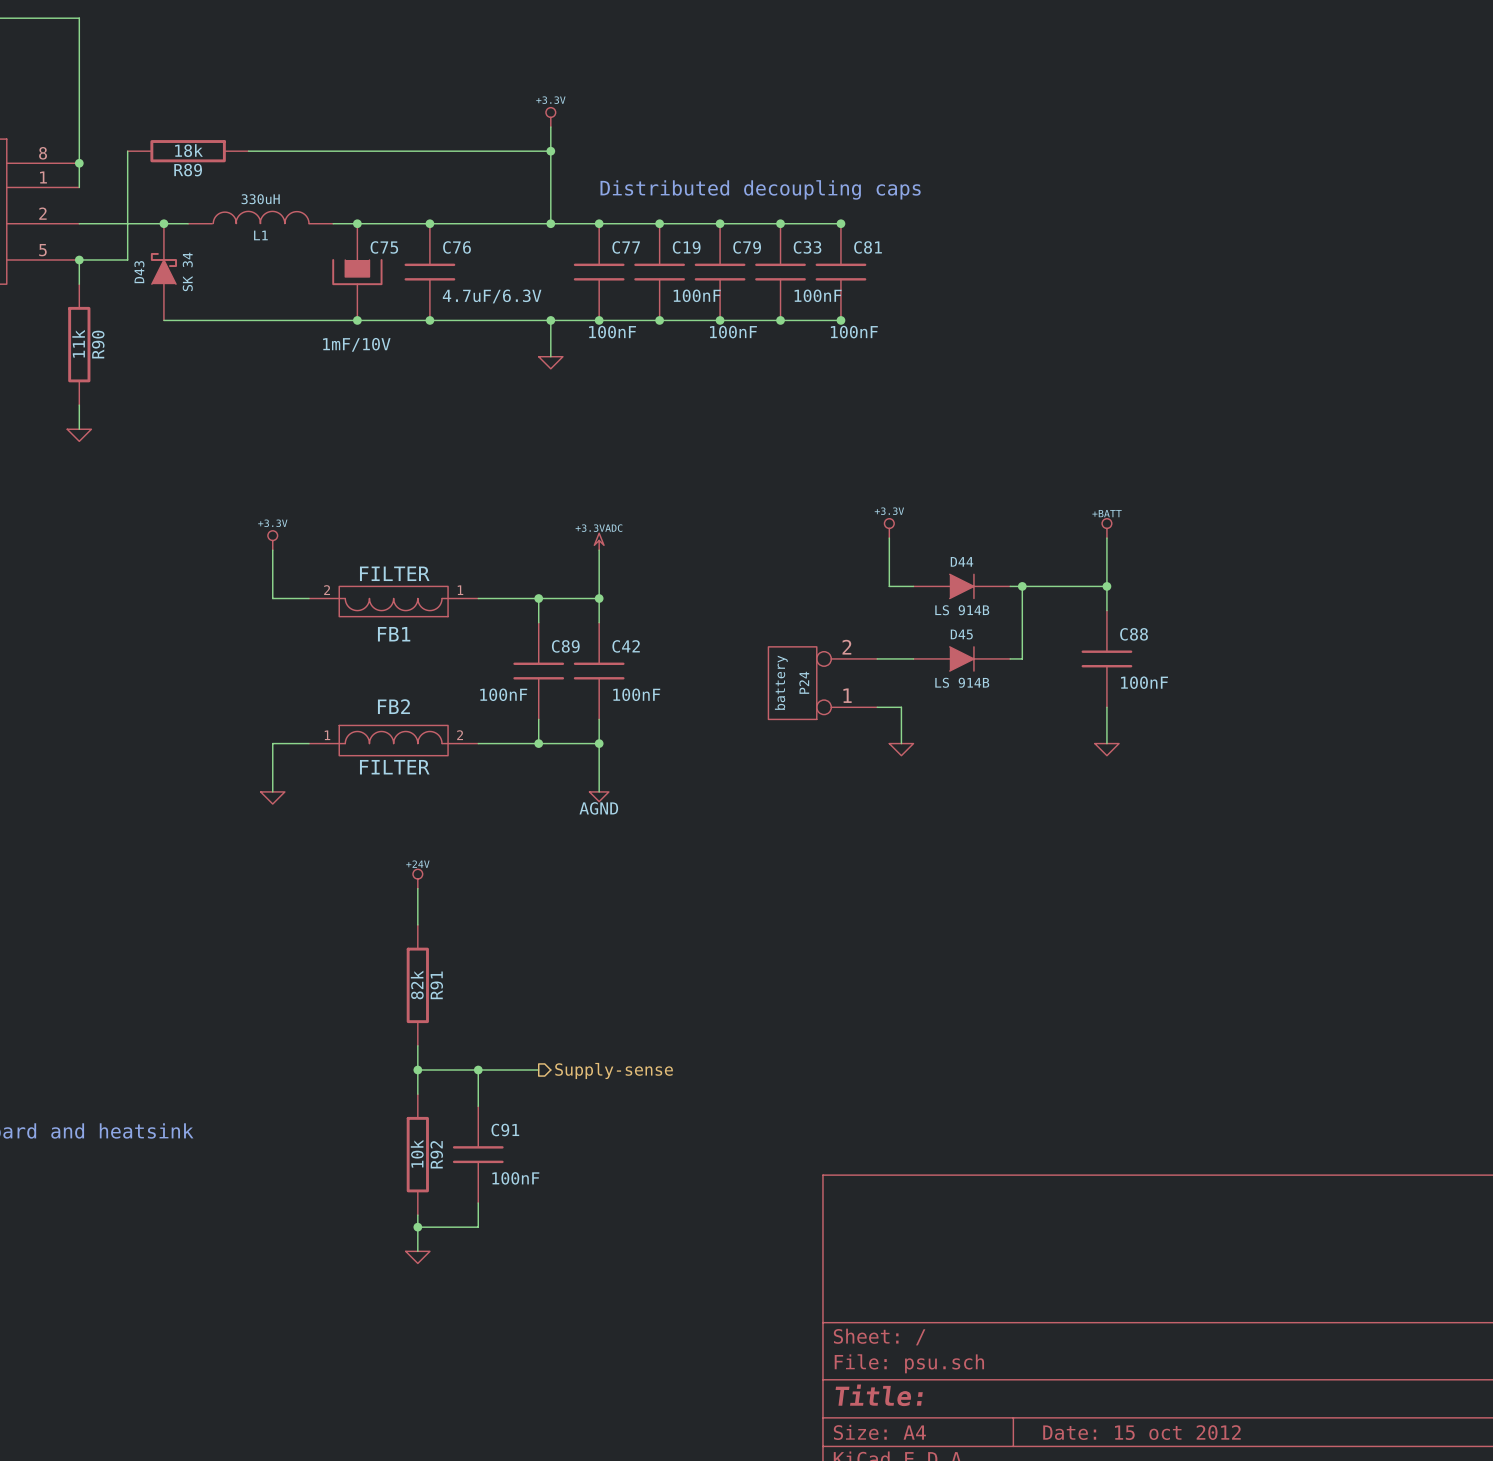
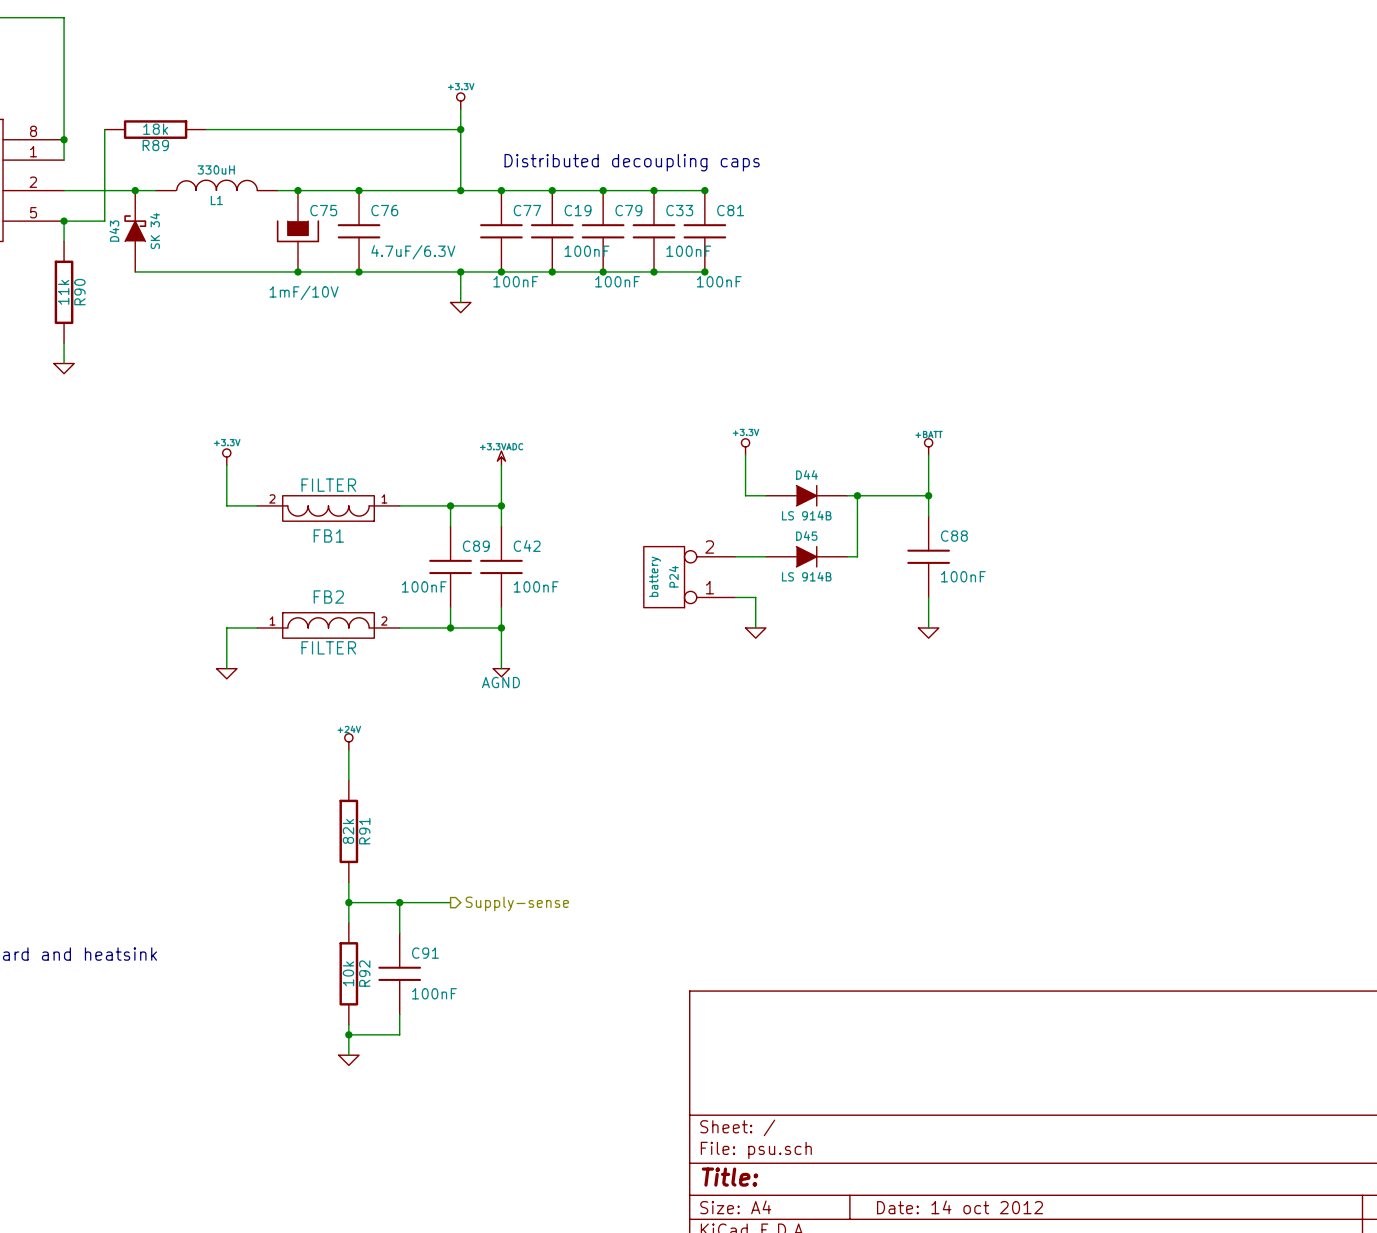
title block: Date: 15 oct 2012 (1141, 1432) -> Date: 14 oct 2012 (959, 1207)

